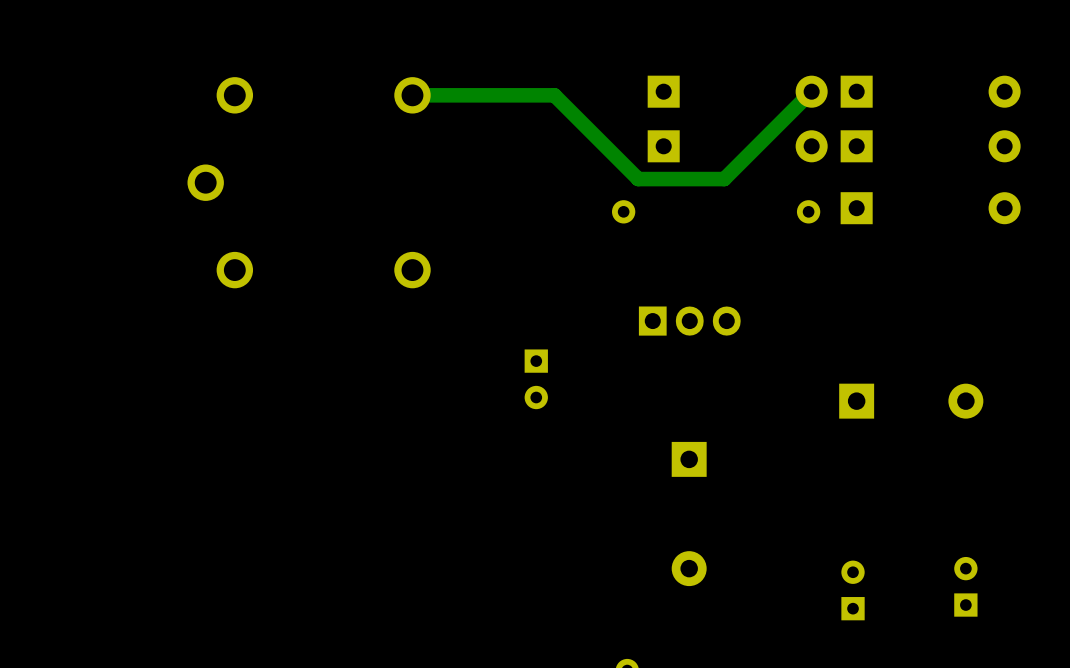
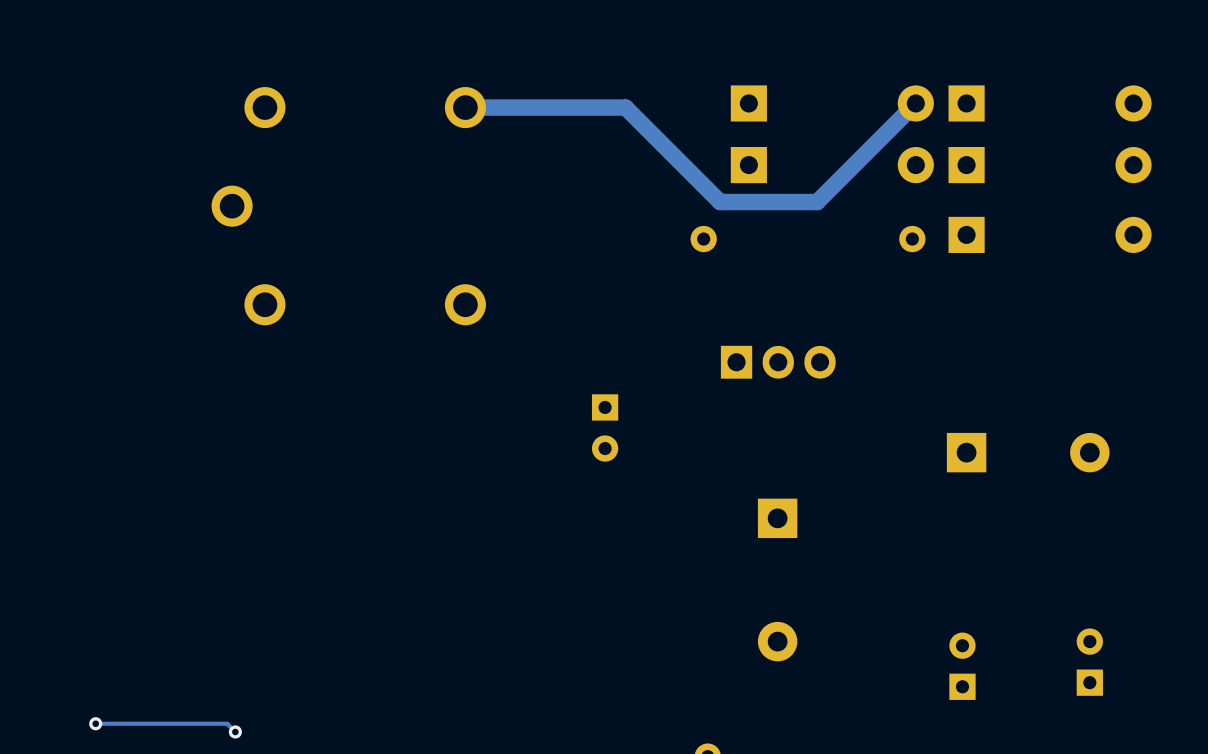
track: none -> (95, 723) (227, 723) (235, 731)
via: none -> (95, 723)
via: none -> (235, 731)

